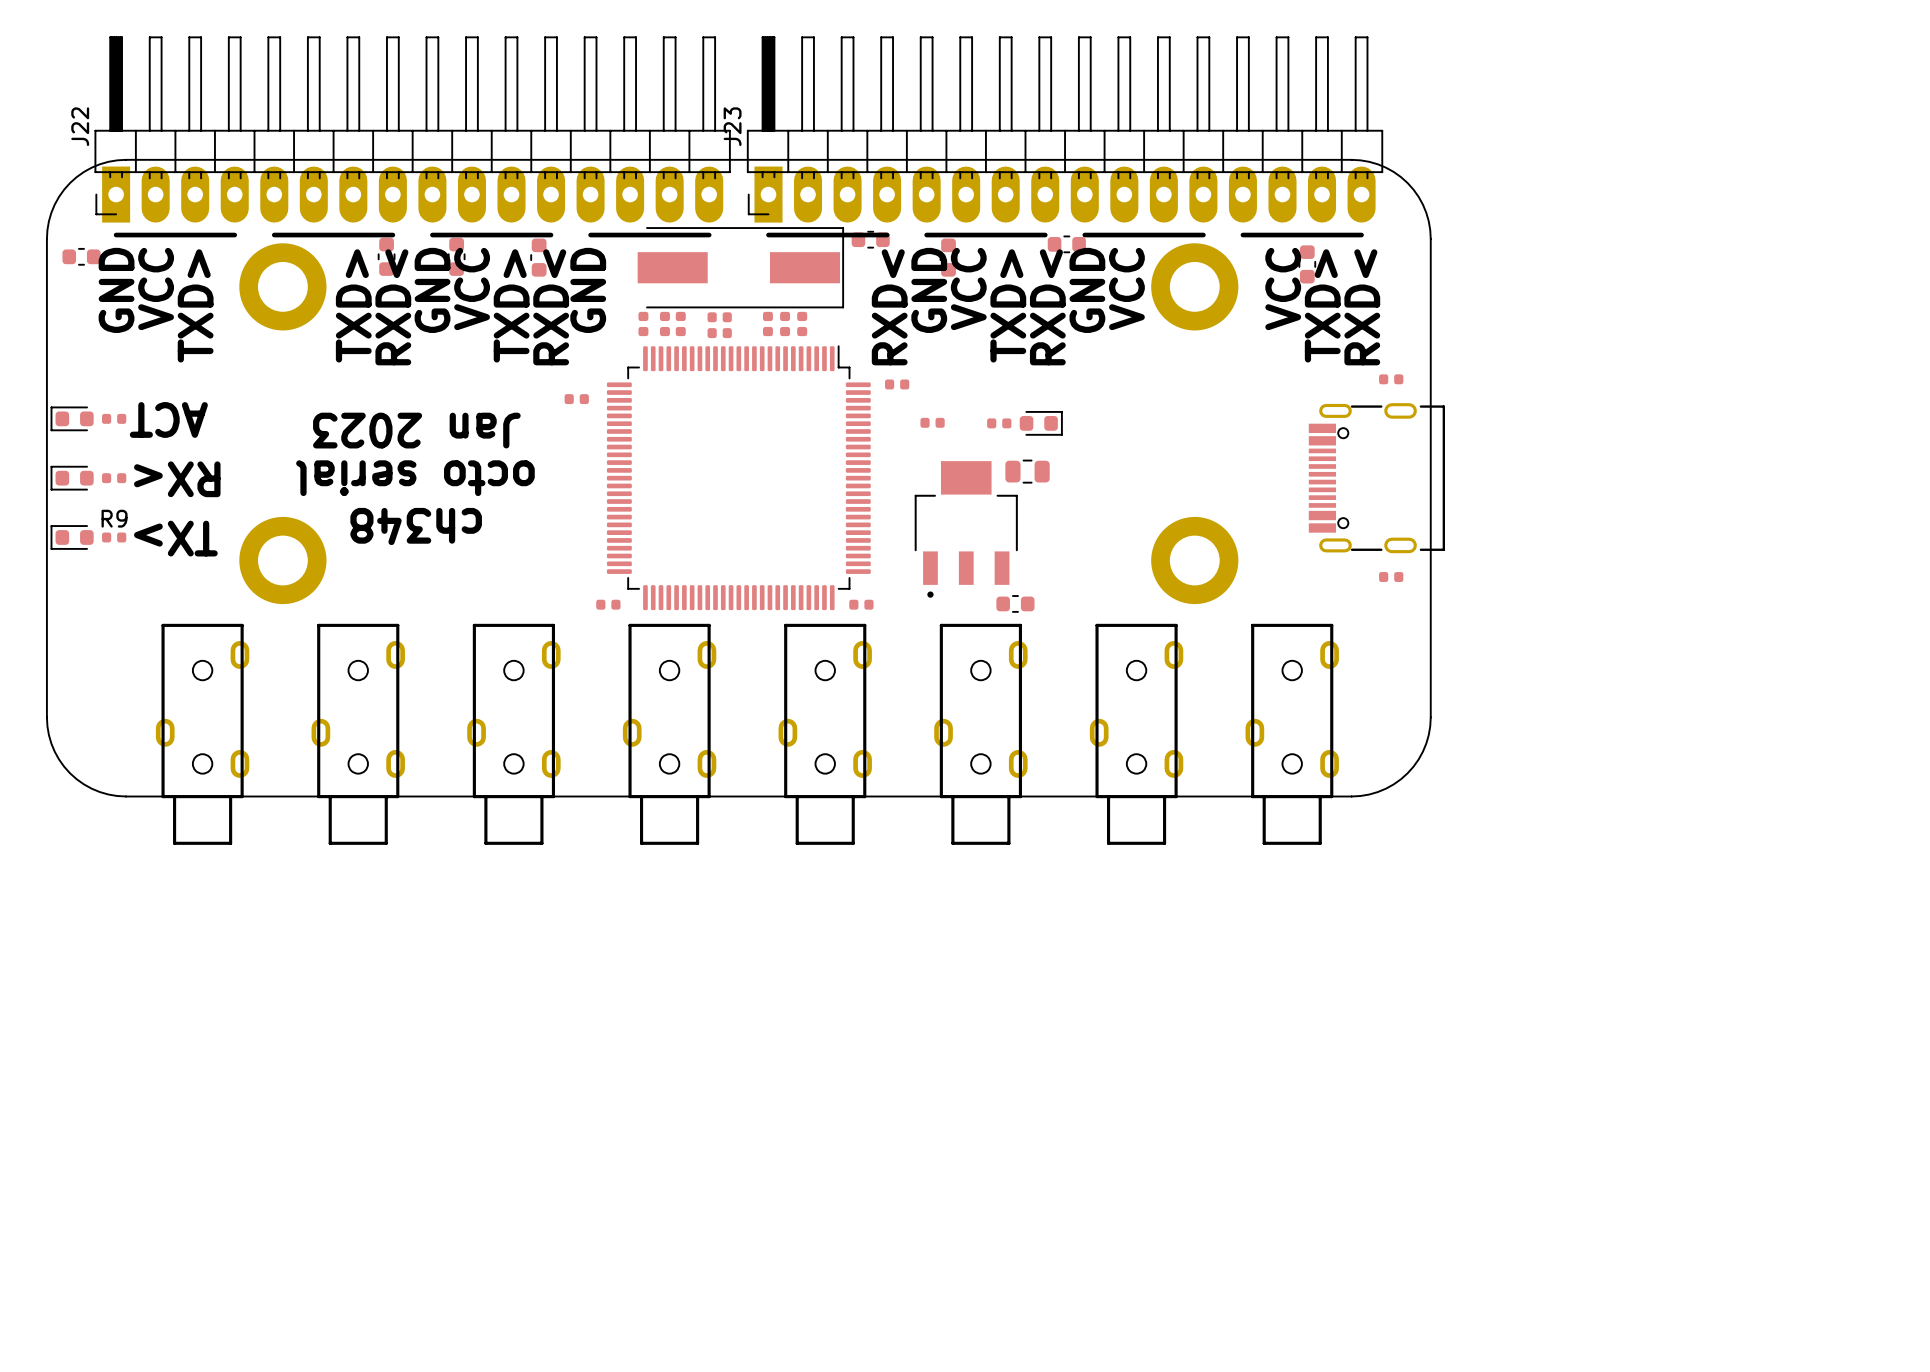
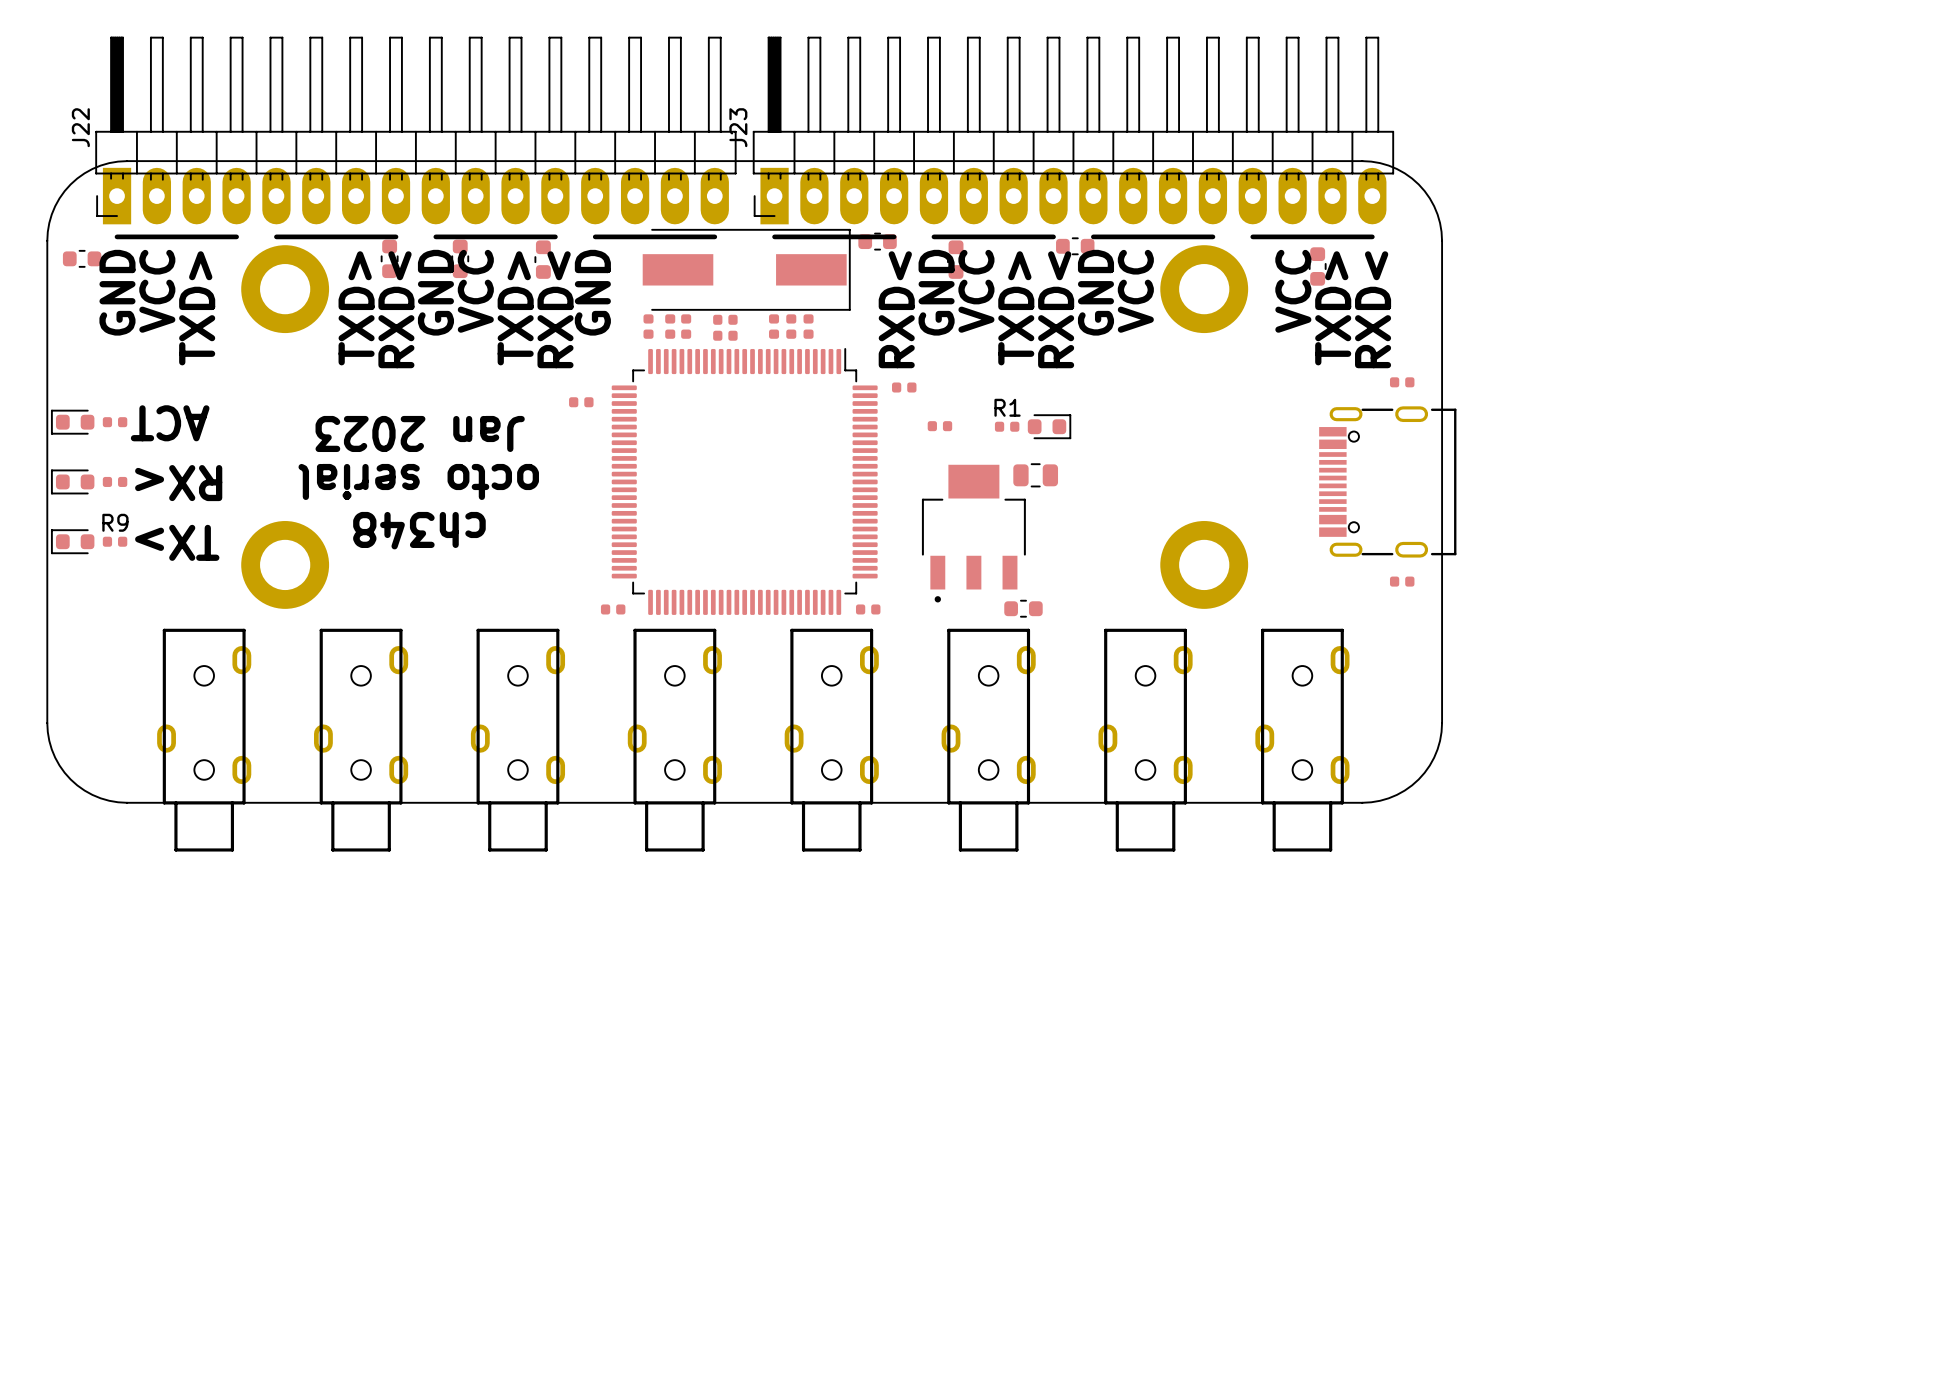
R1 name: none -> R1 (1007, 407)

